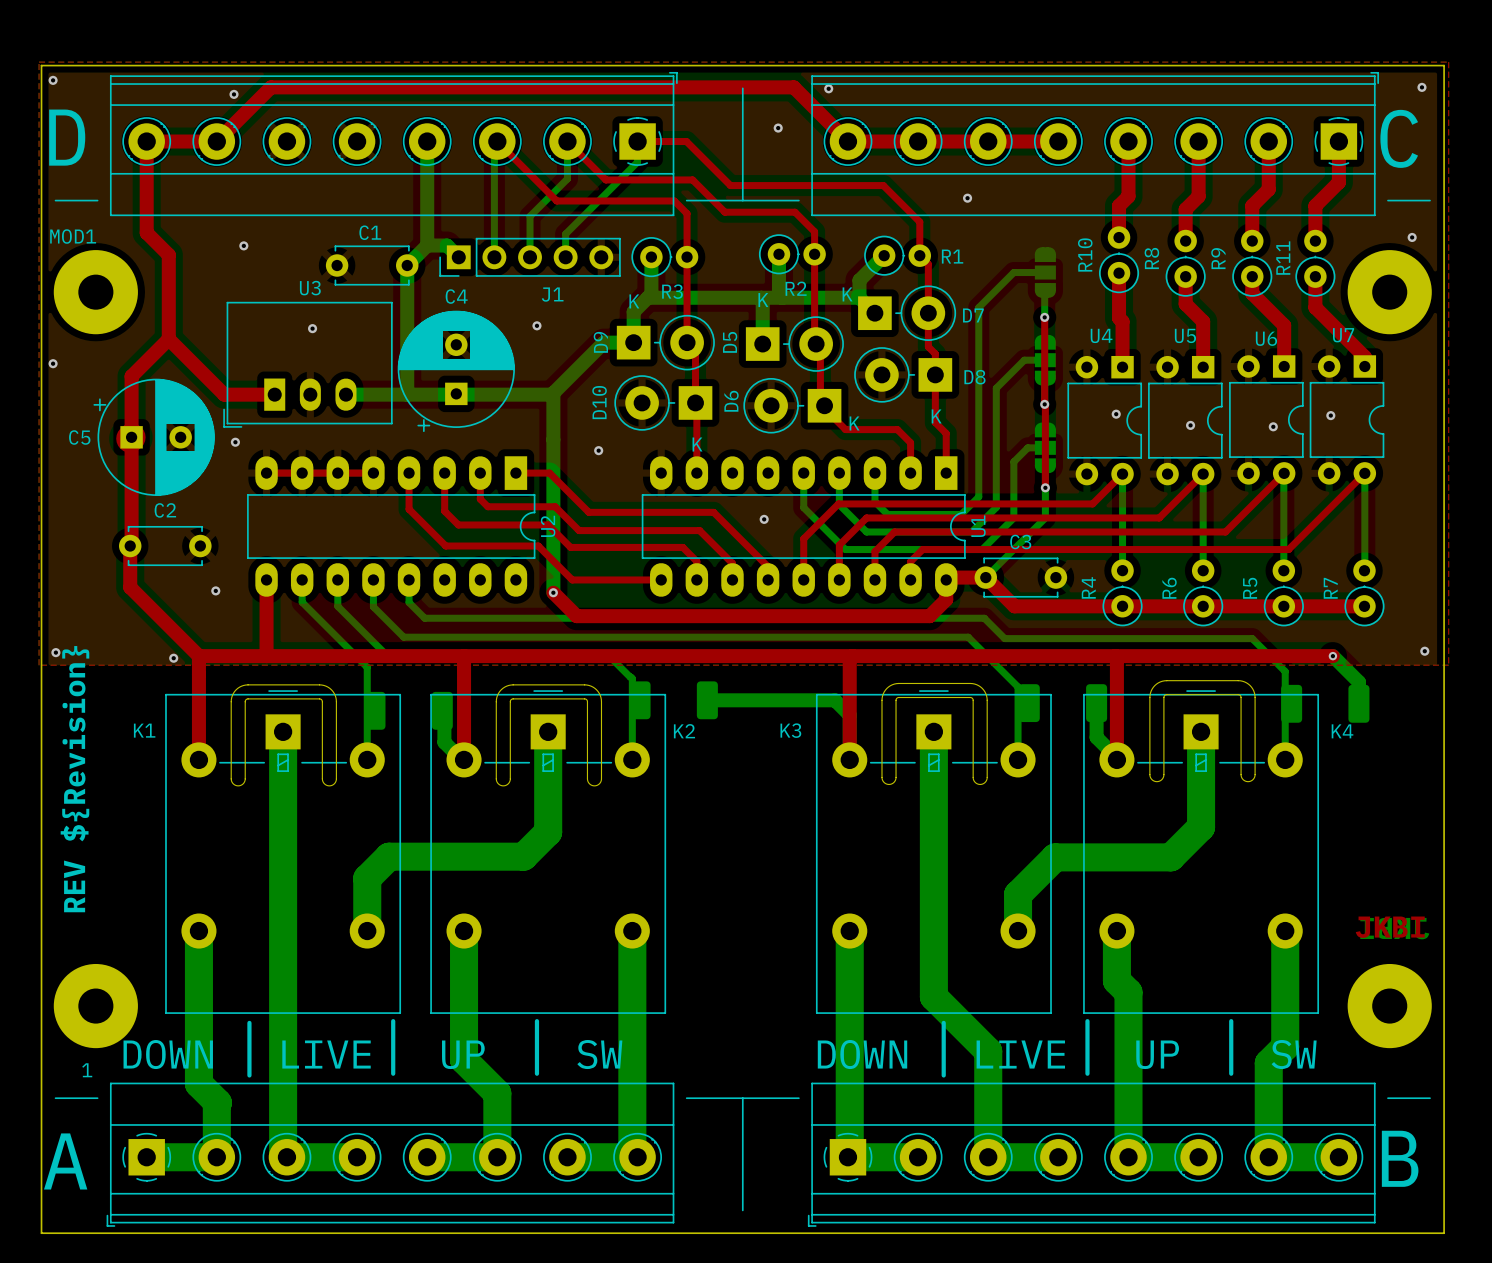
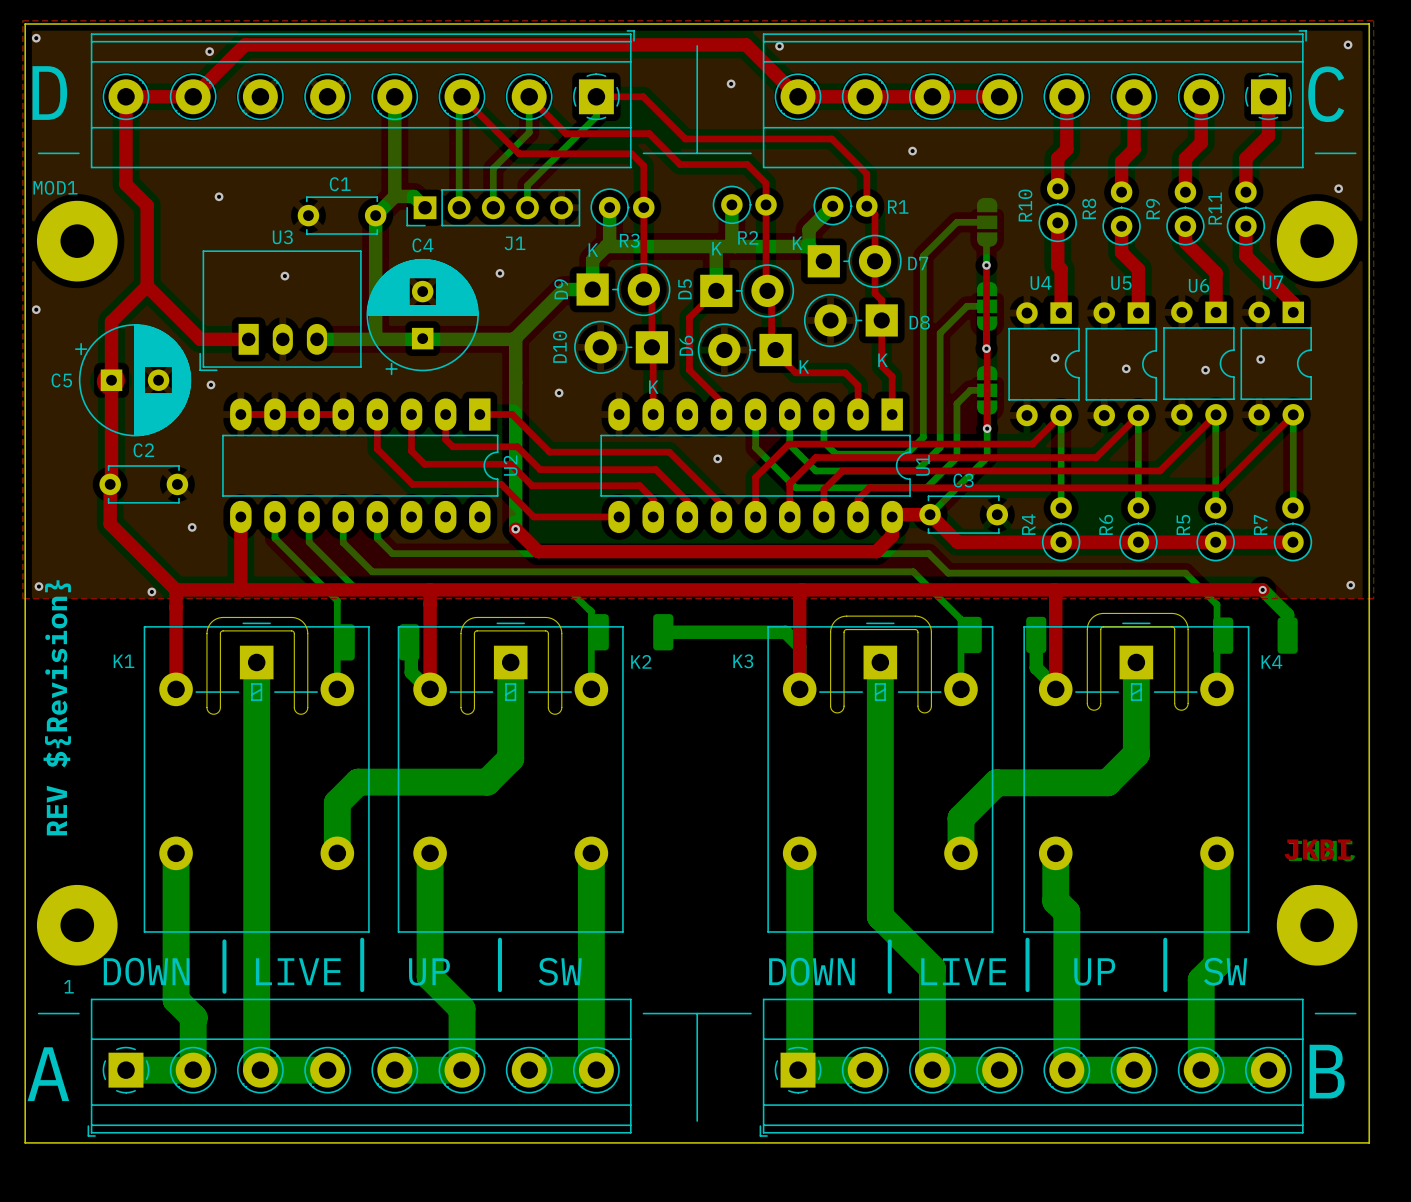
top track: none -> (716, 290) (689, 317) (689, 370) (721, 402) (721, 414)

